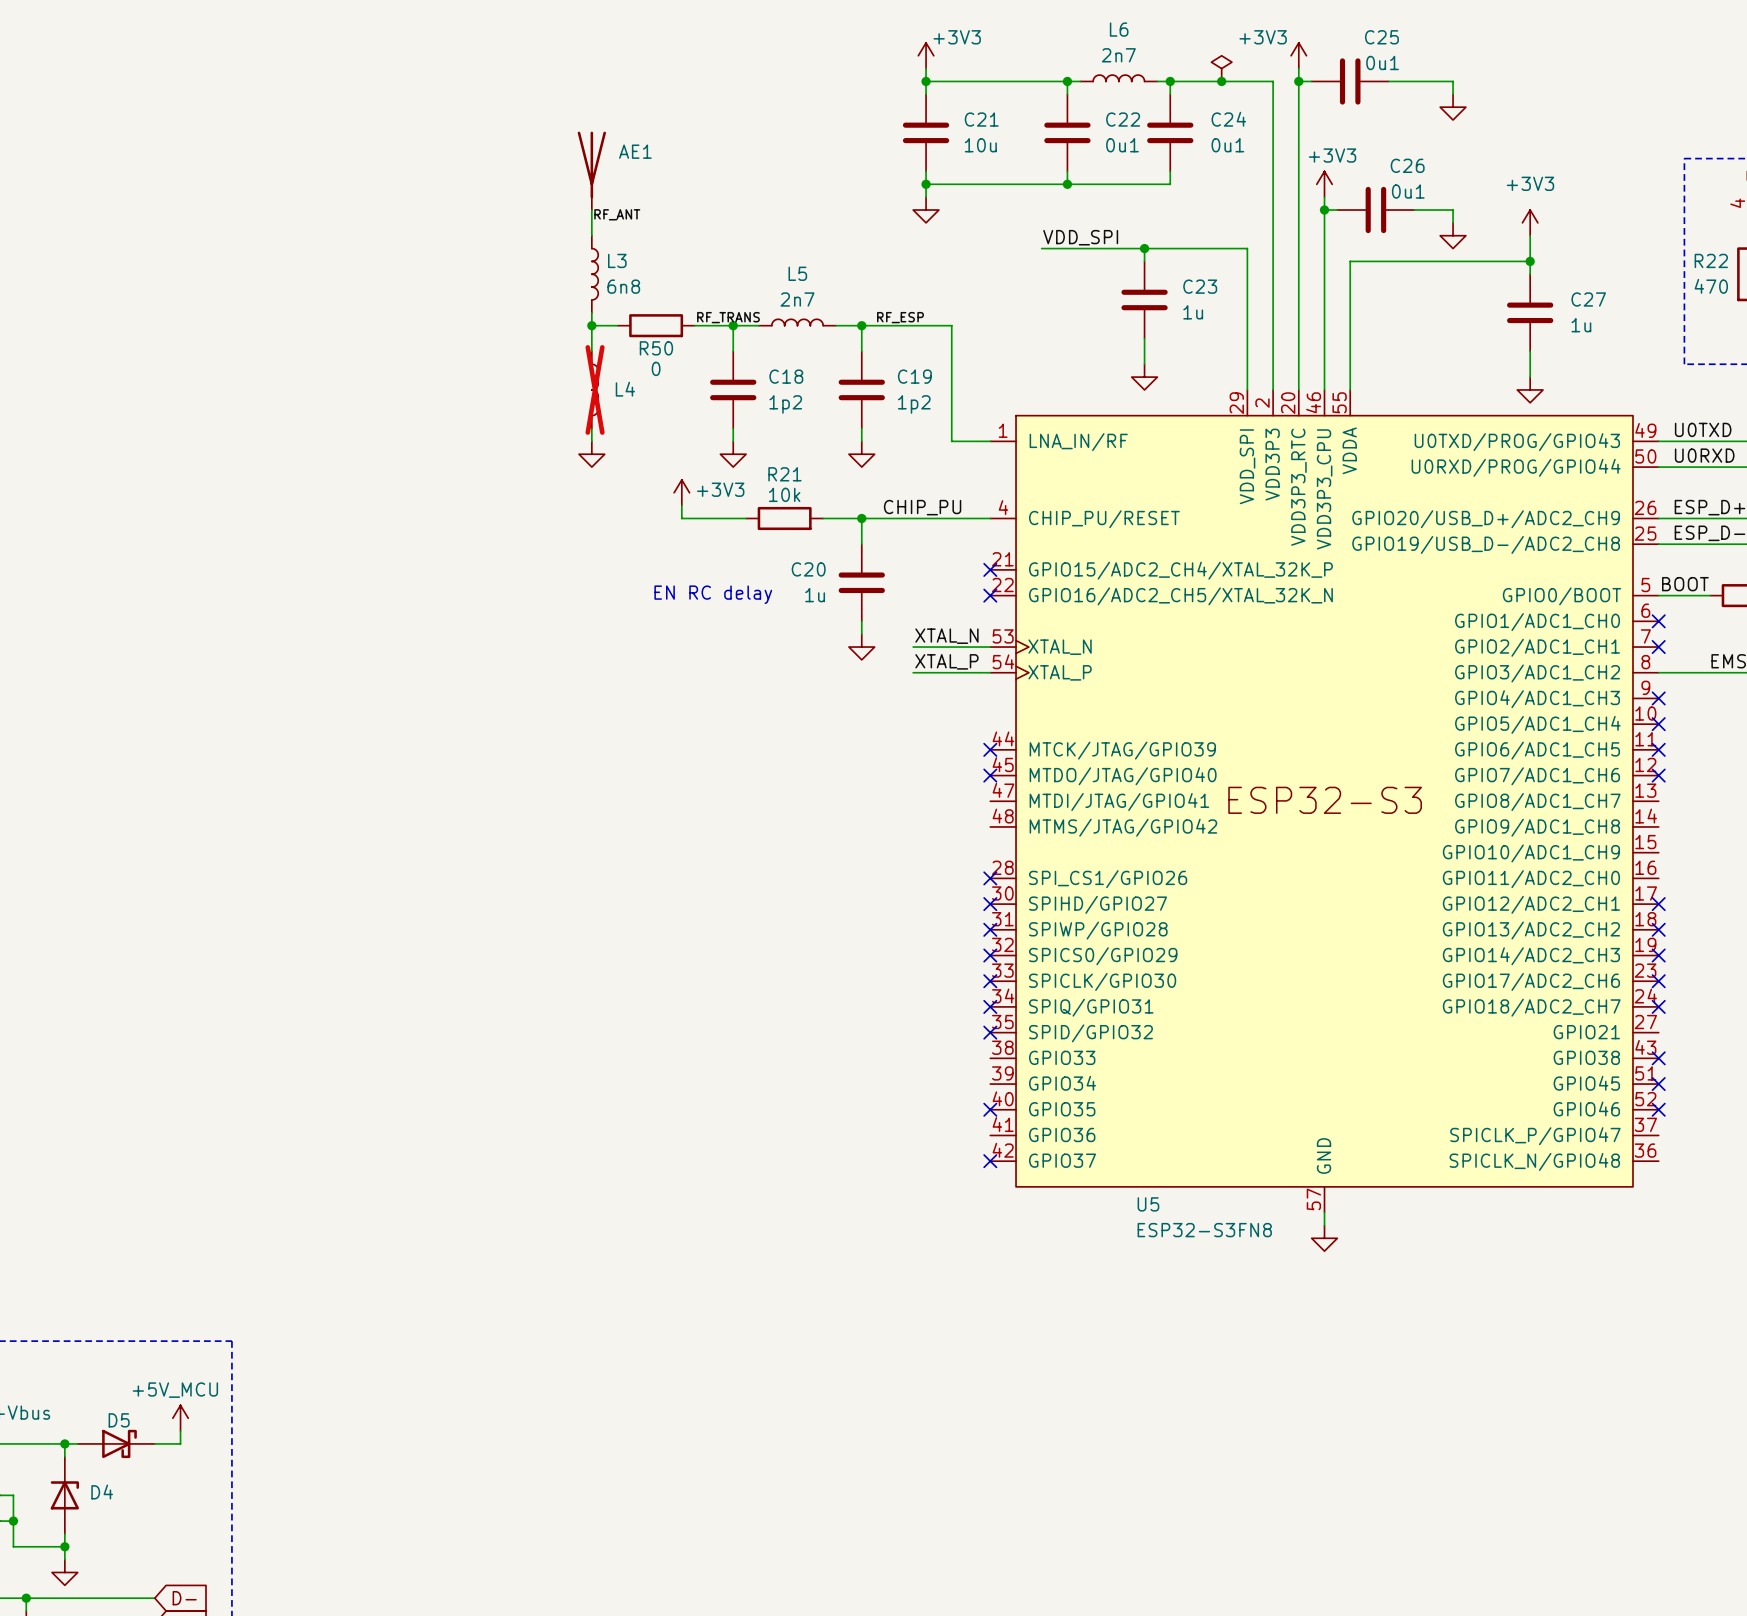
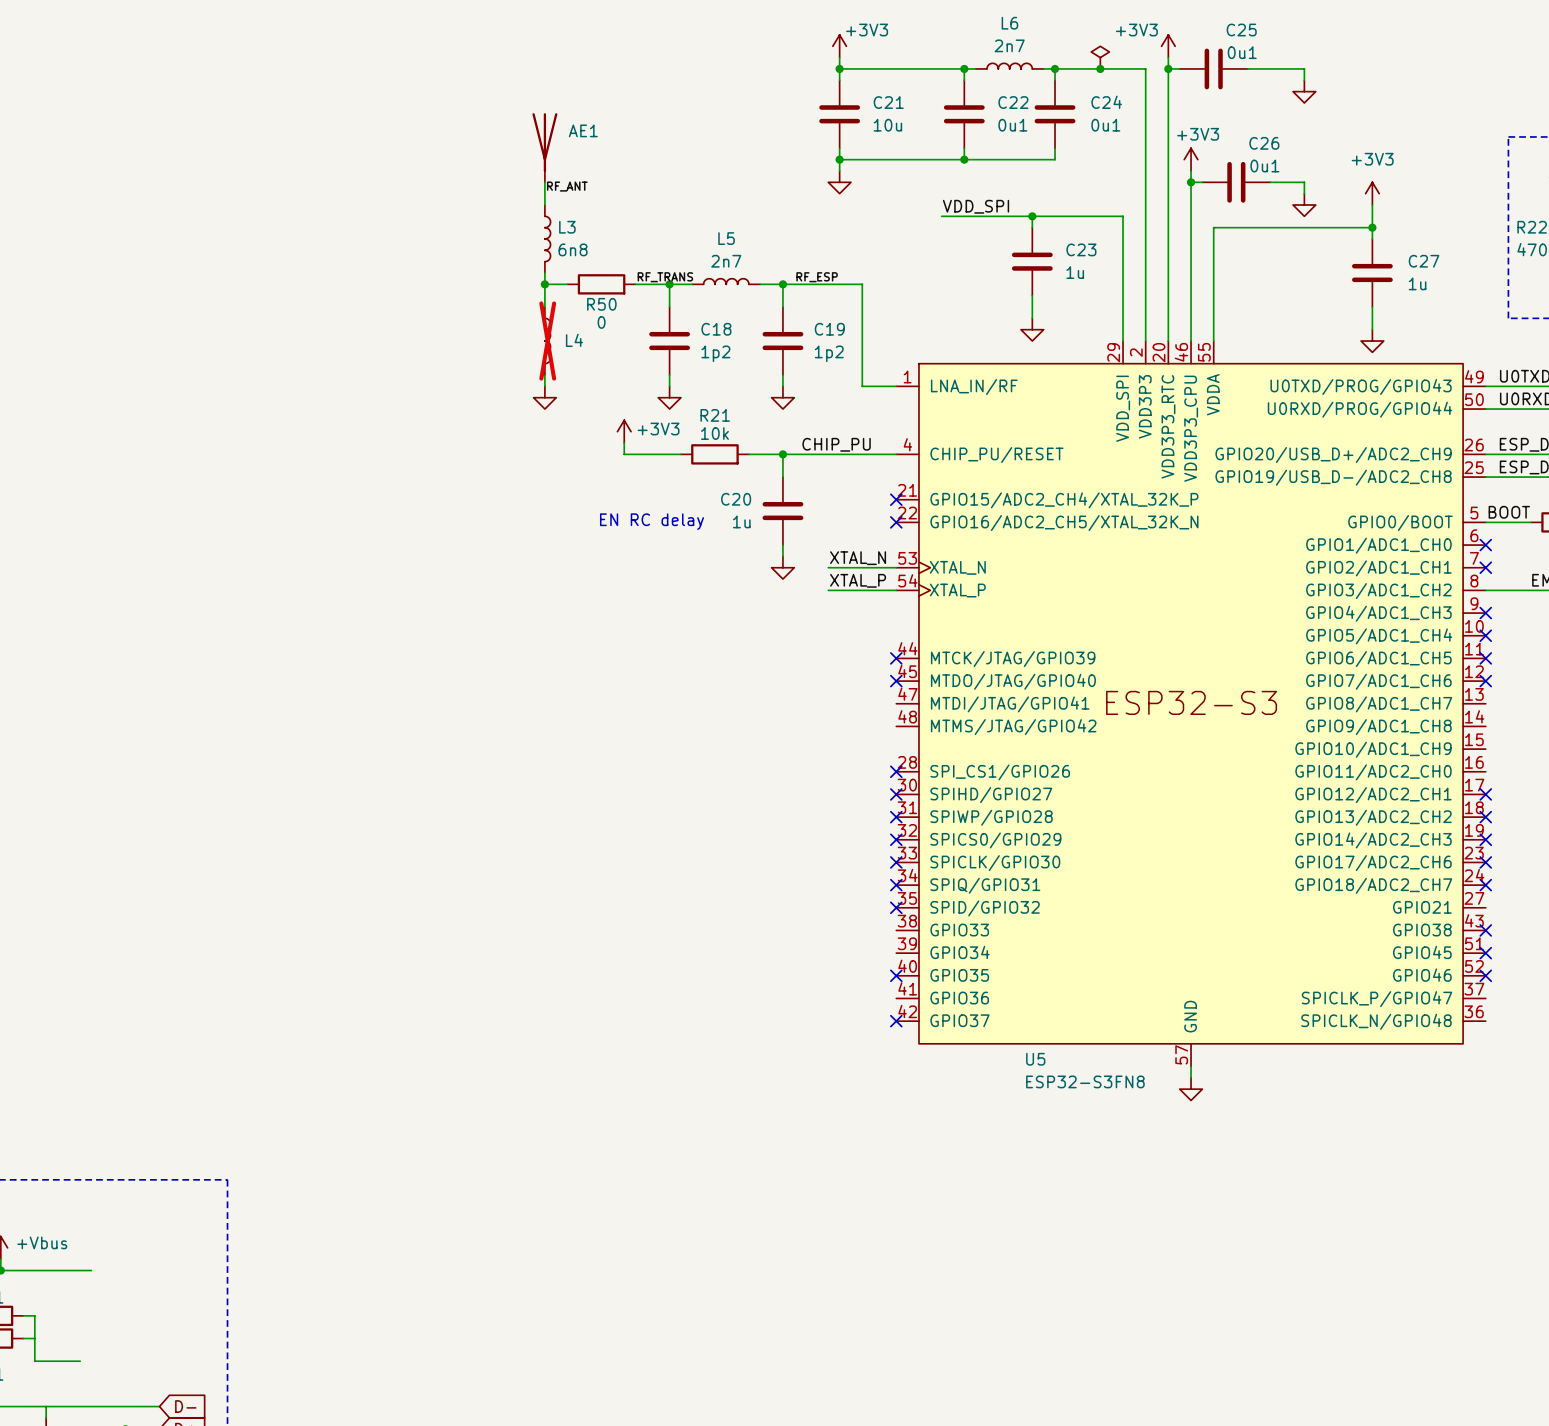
power symbol: +5V_MCU (180, 1418) -> none
wire: (180, 1431) (180, 1443) (154, 1443) -> none
wire: (64, 1443) (64, 1456) -> none
junction: (64, 1443) -> none
D5: (116, 1443) -> none
D4: (64, 1495) -> none
junction: (13, 1521) -> none
wire: (64, 1533) (64, 1559) -> none
junction: (64, 1546) -> none
power symbol: (64, 1572) -> none
junction: (26, 1598) -> none

